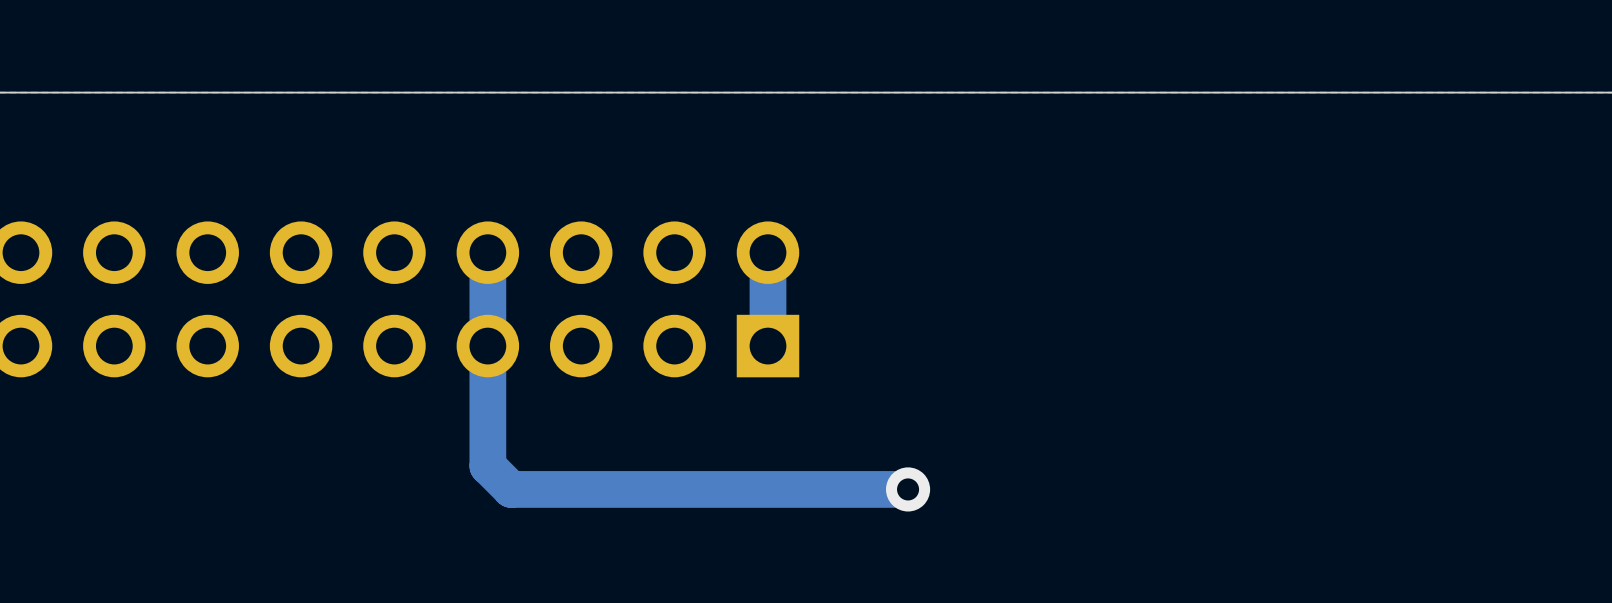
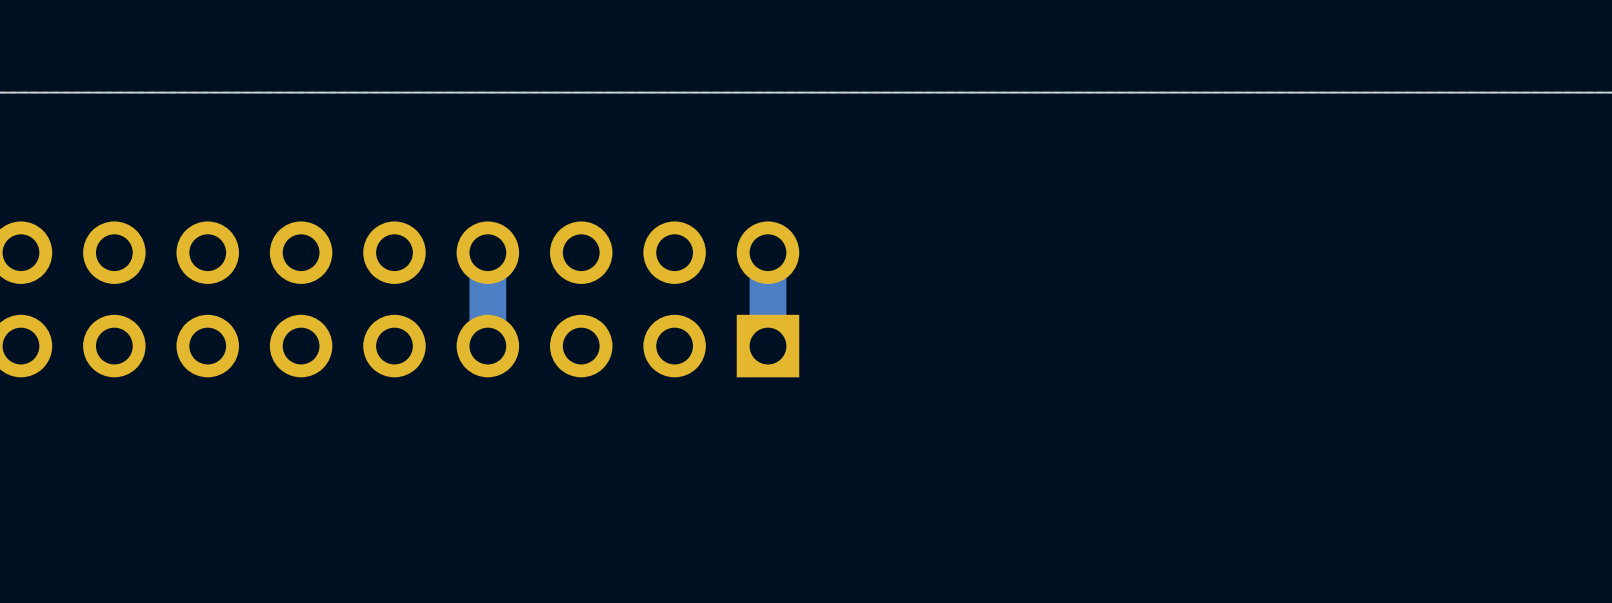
track: (487, 346) (487, 466) (511, 489) (908, 489) -> none
via: (908, 489) -> none

